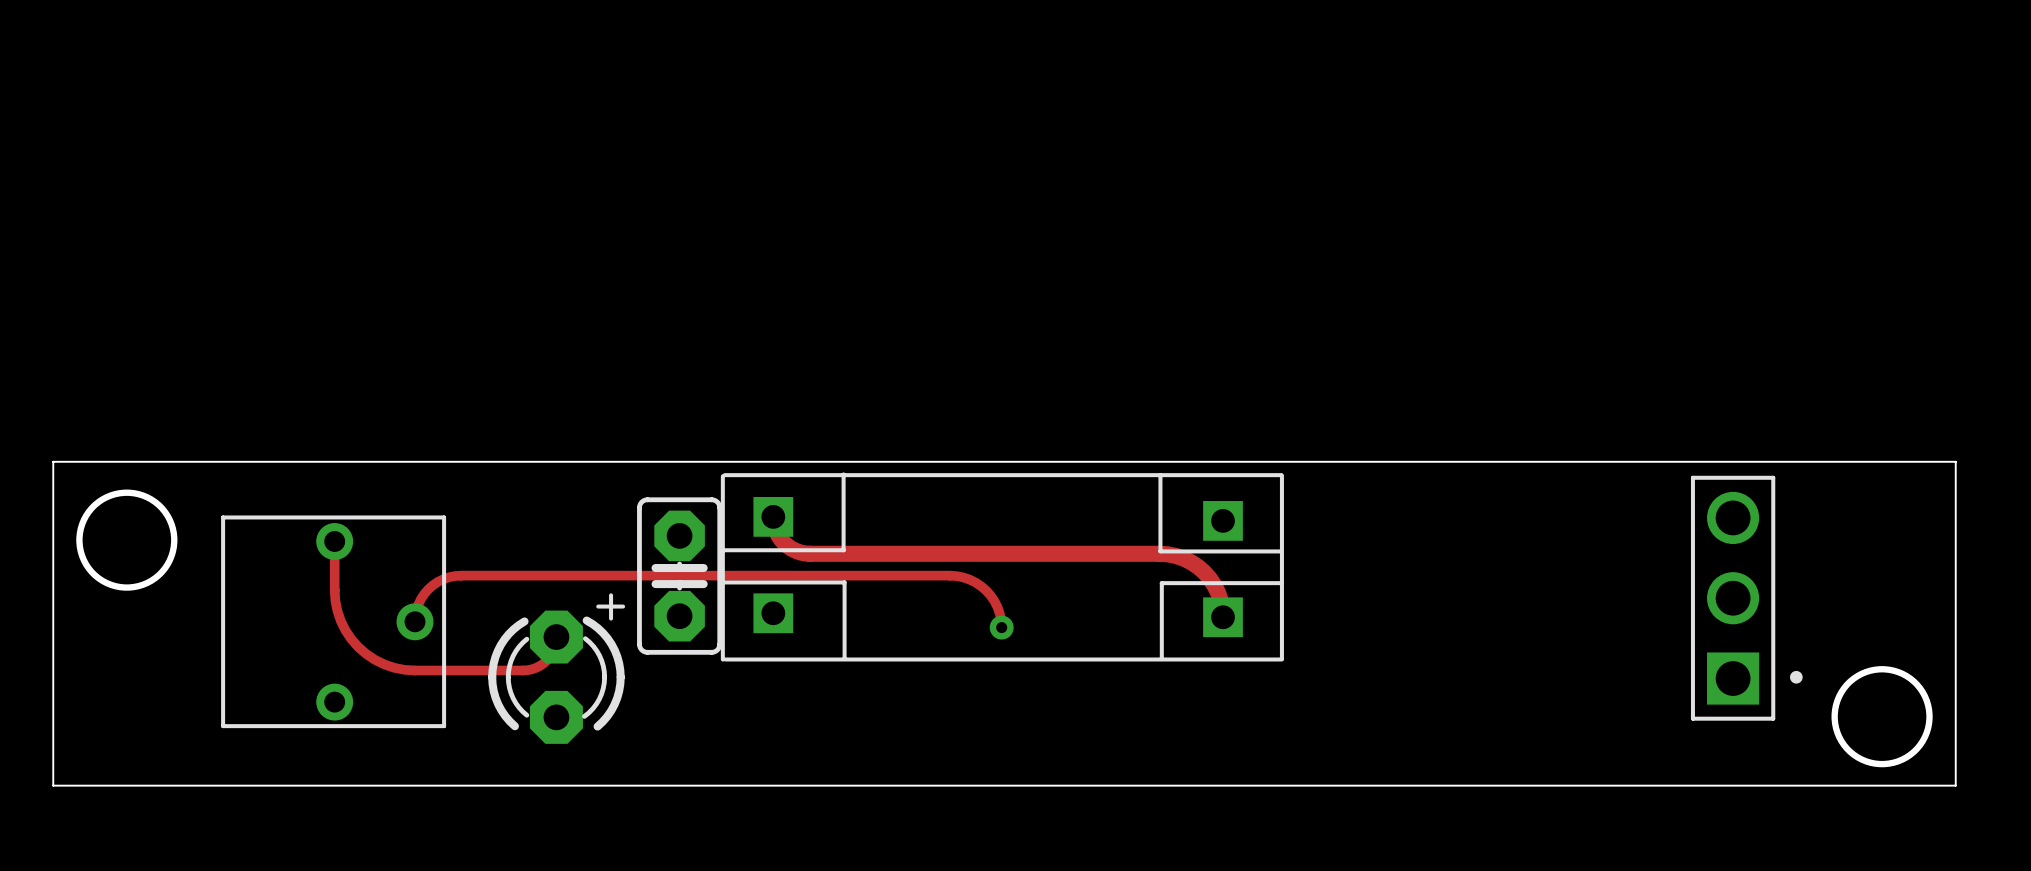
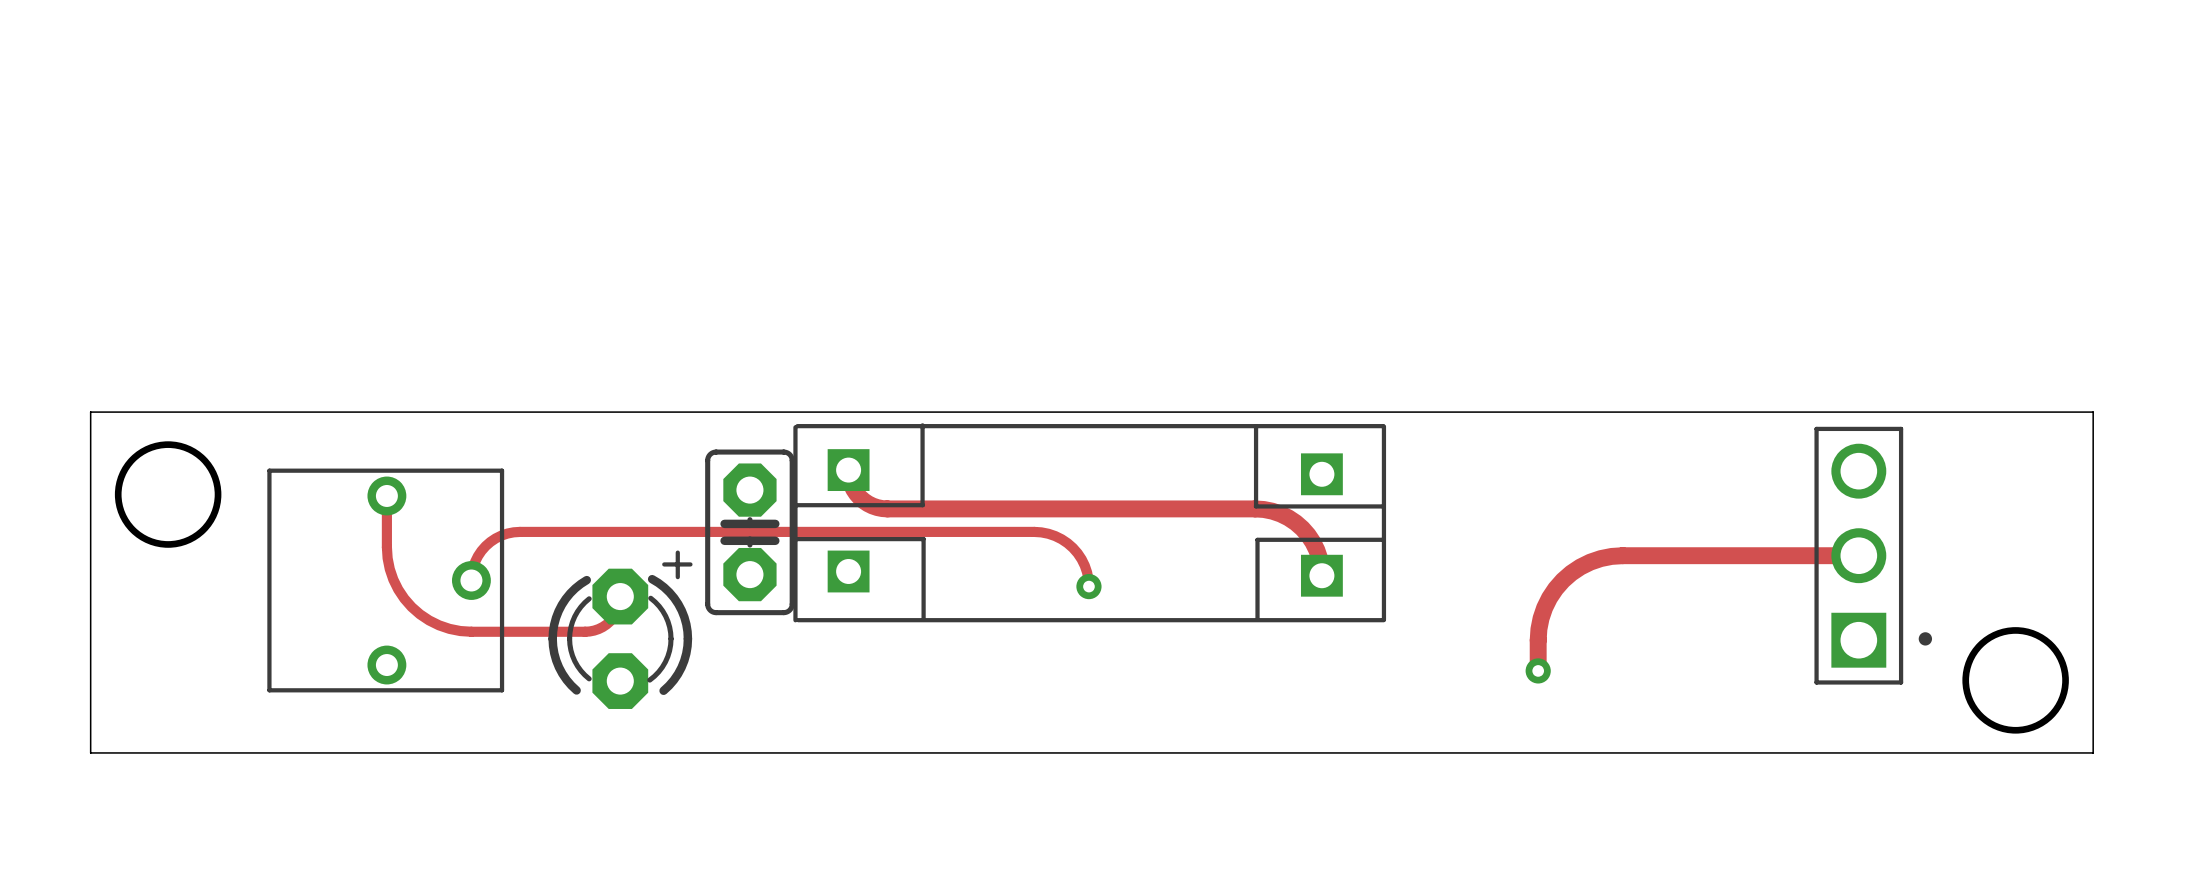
track: none -> (1858, 555) (1622, 555) (1590, 562) (1562, 580) (1544, 607) (1538, 629) (1538, 670)
via: none -> (1538, 670)

